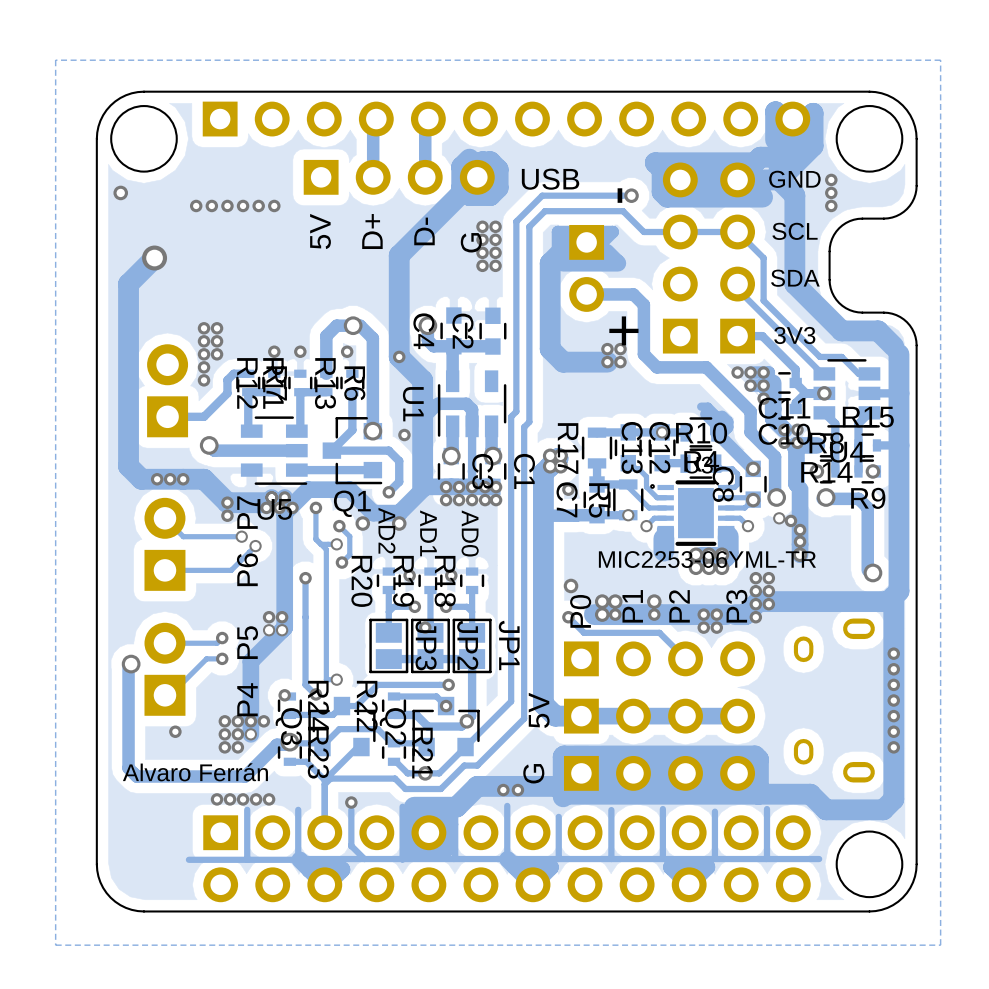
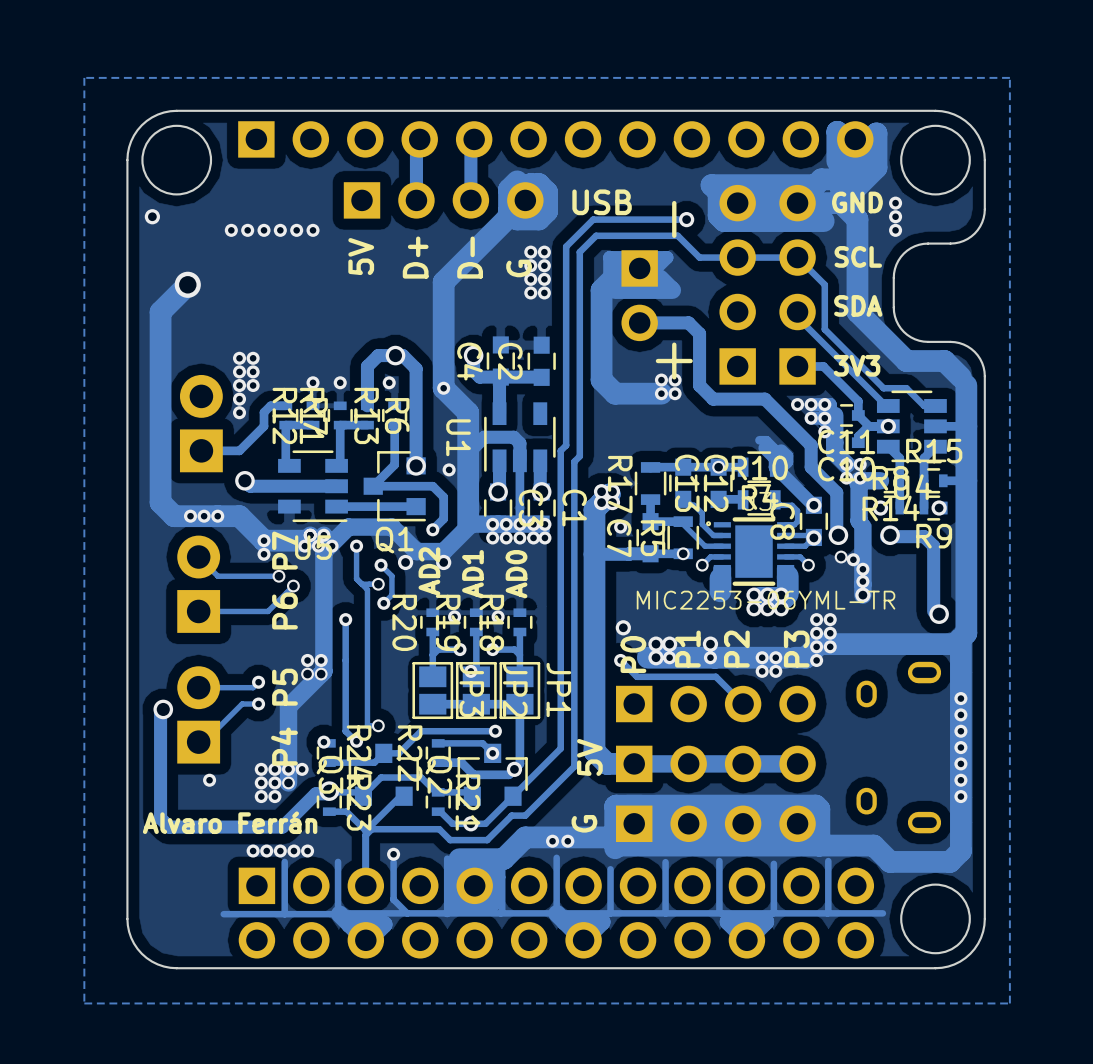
text rotation: 0° (386, 530) -> 180° (429, 571)
text rotation: 0° (428, 533) -> 180° (472, 574)
text rotation: 0° (470, 533) -> 180° (516, 574)

